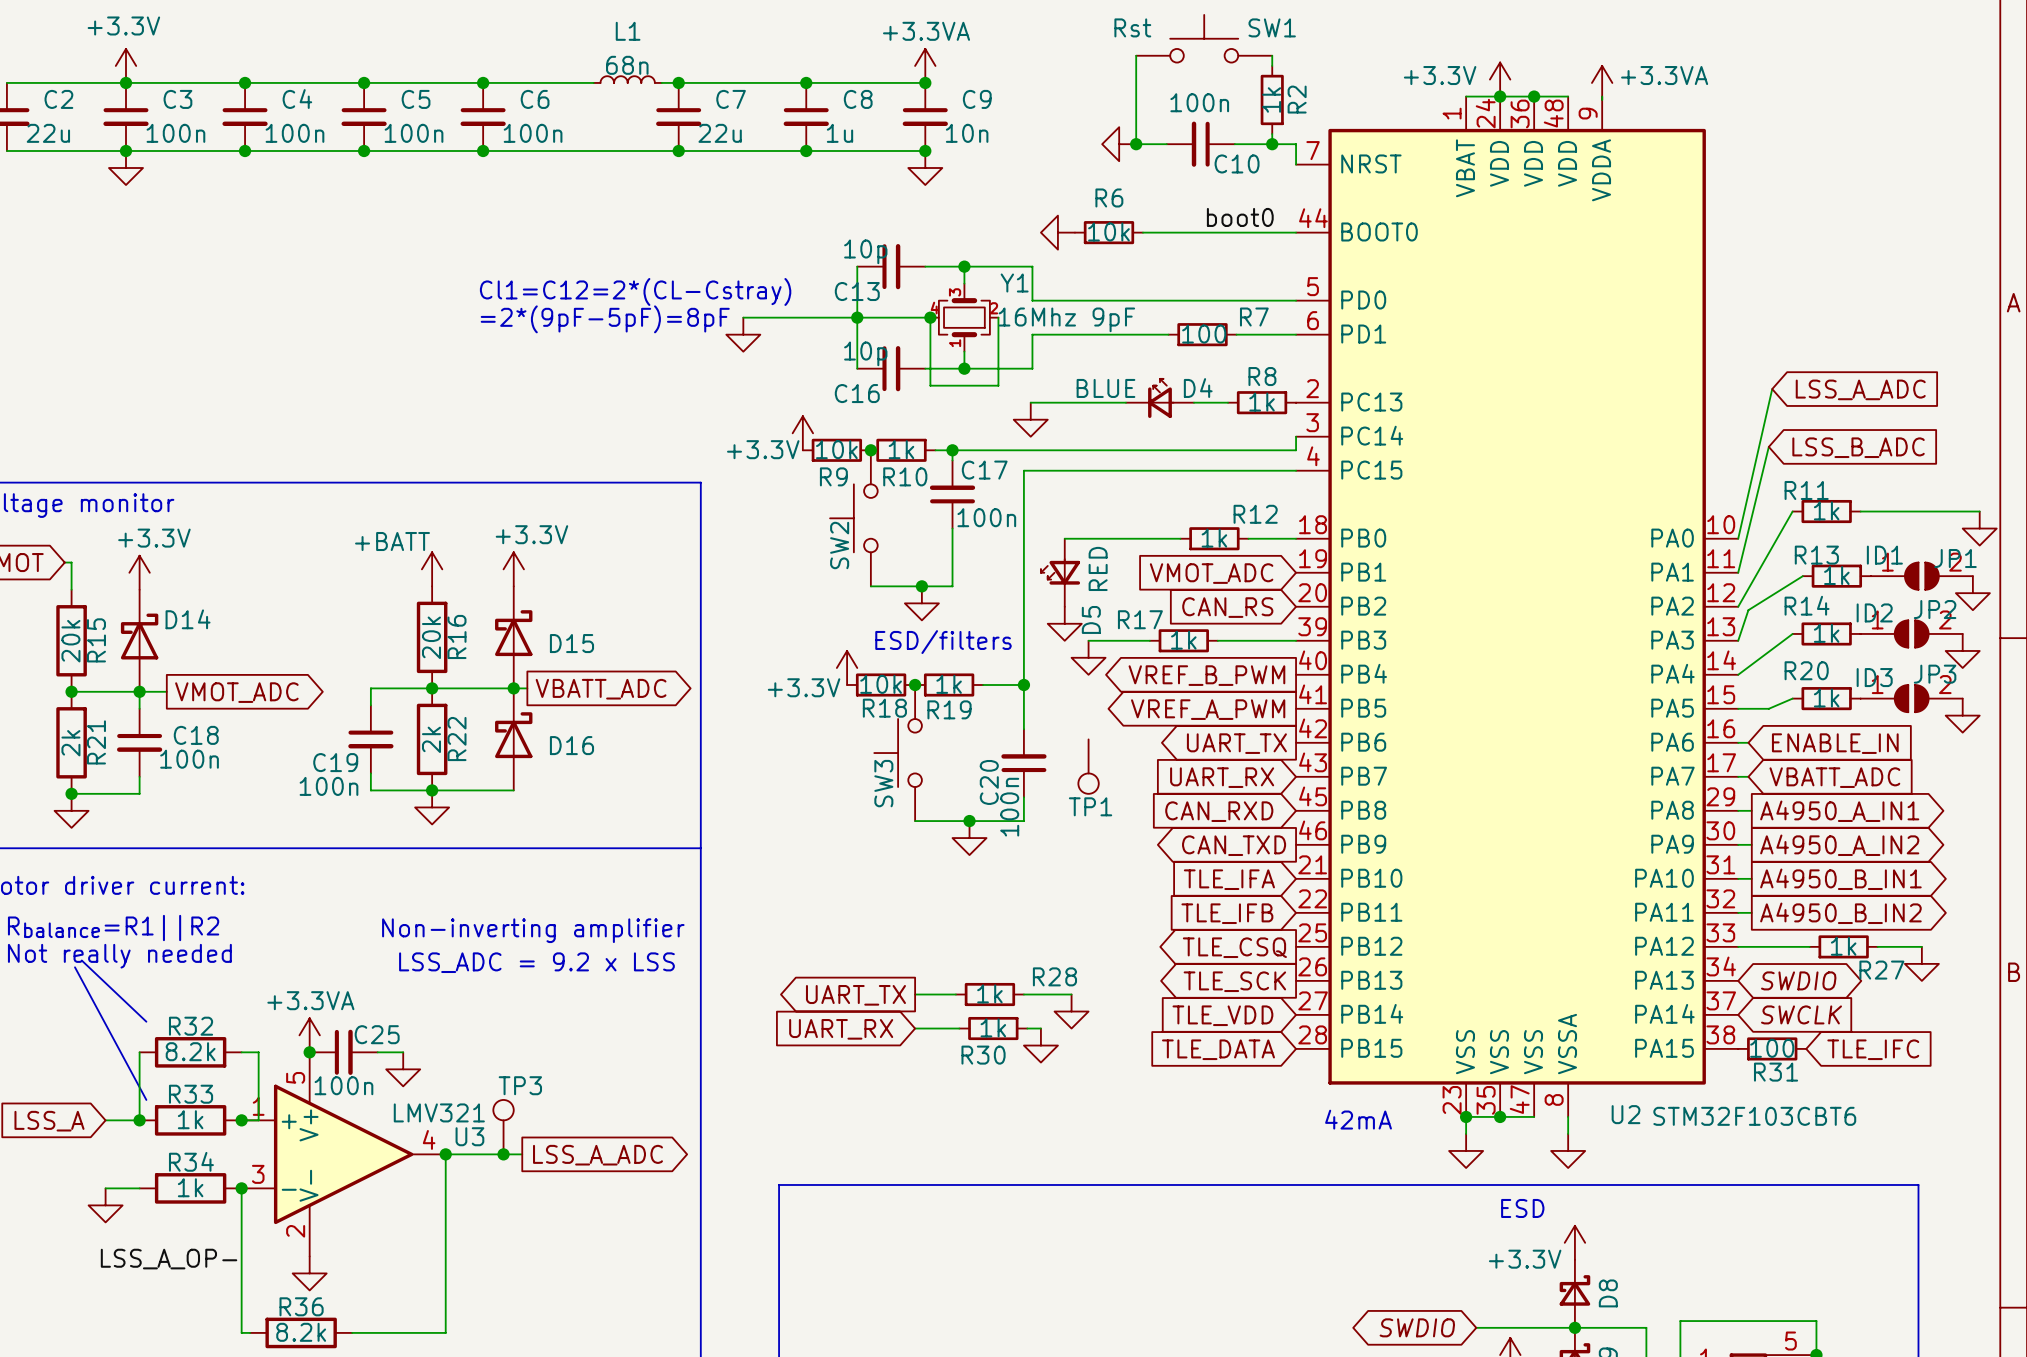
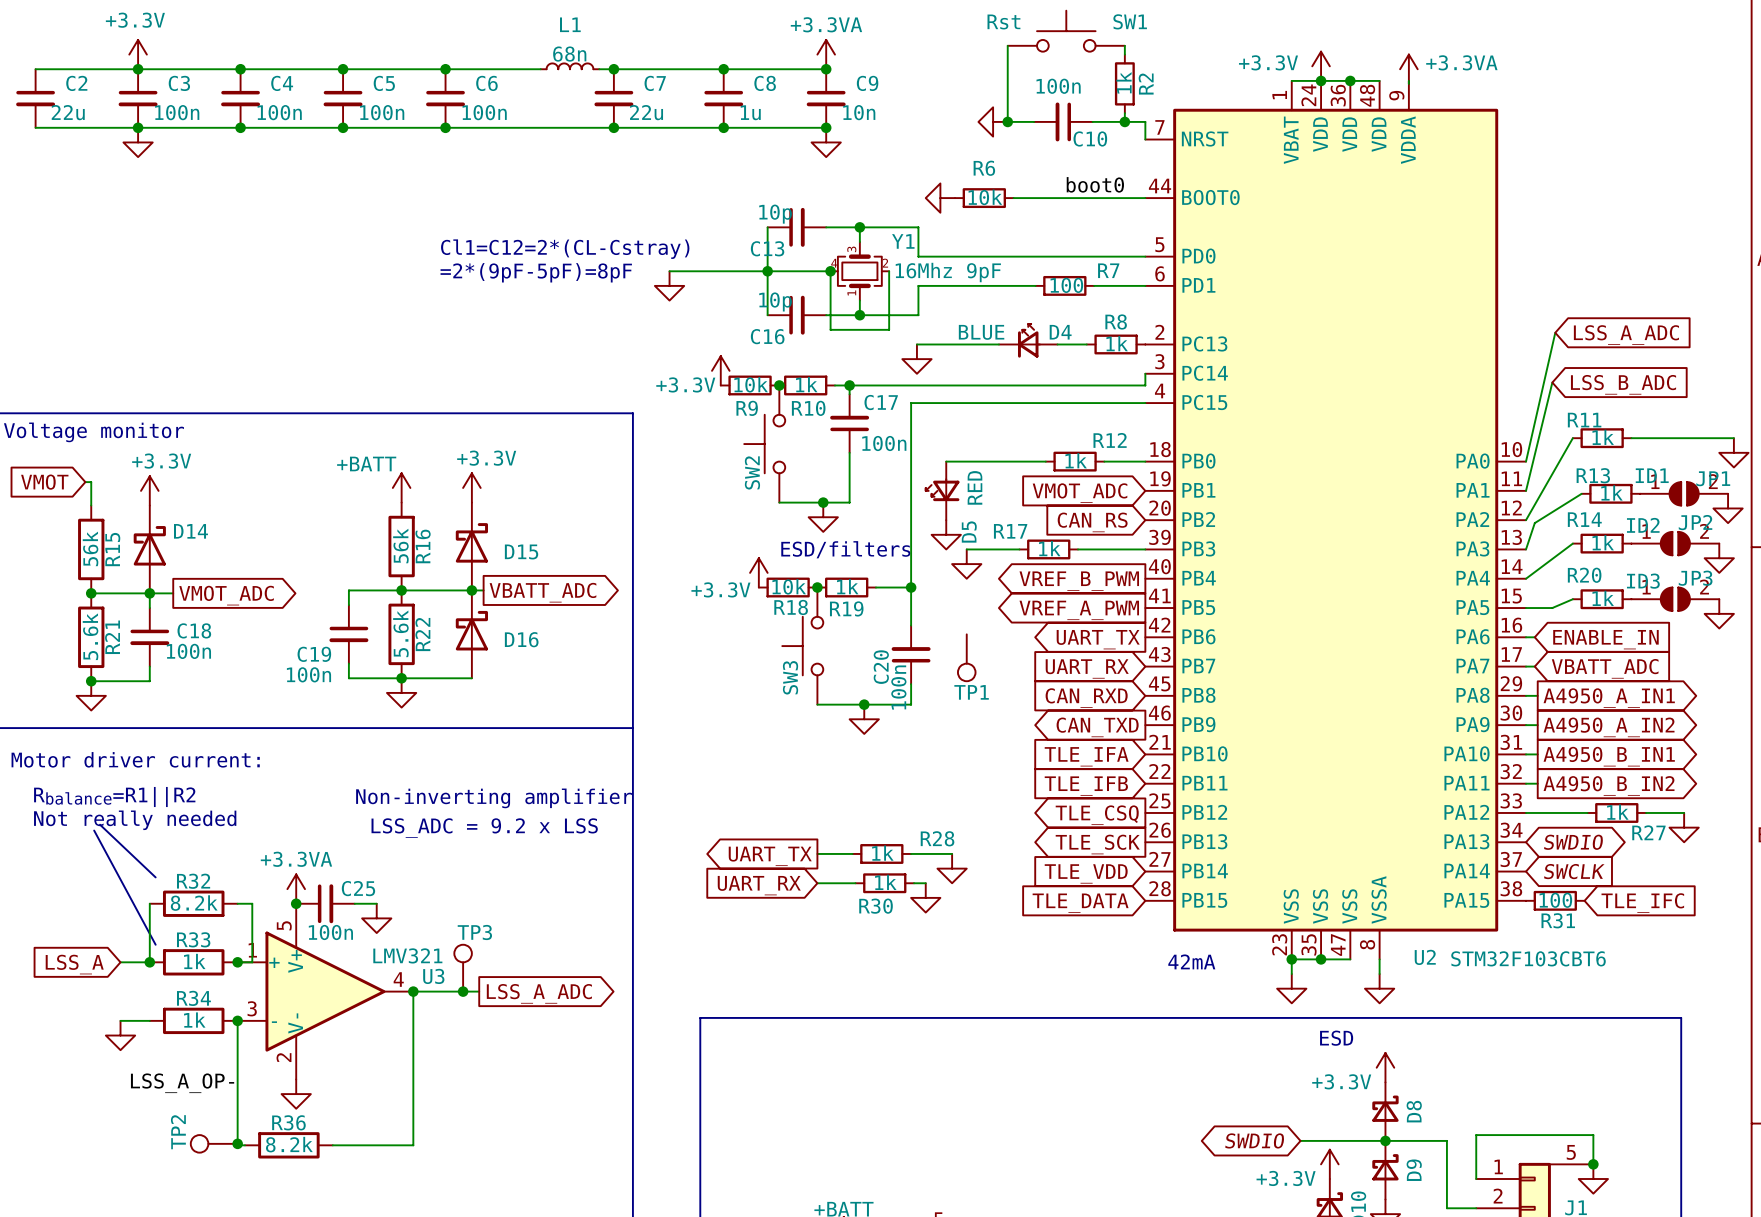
R16 value: 20k (431, 637) -> 56k (400, 545)
R15 value: 20k (70, 641) -> 56k (90, 548)
R22 value: 2k (431, 739) -> 5.6k (400, 633)
R21 value: 2k (70, 743) -> 5.6k (90, 636)
TP2: none -> (214, 1143)
junction: none -> (237, 1143)

